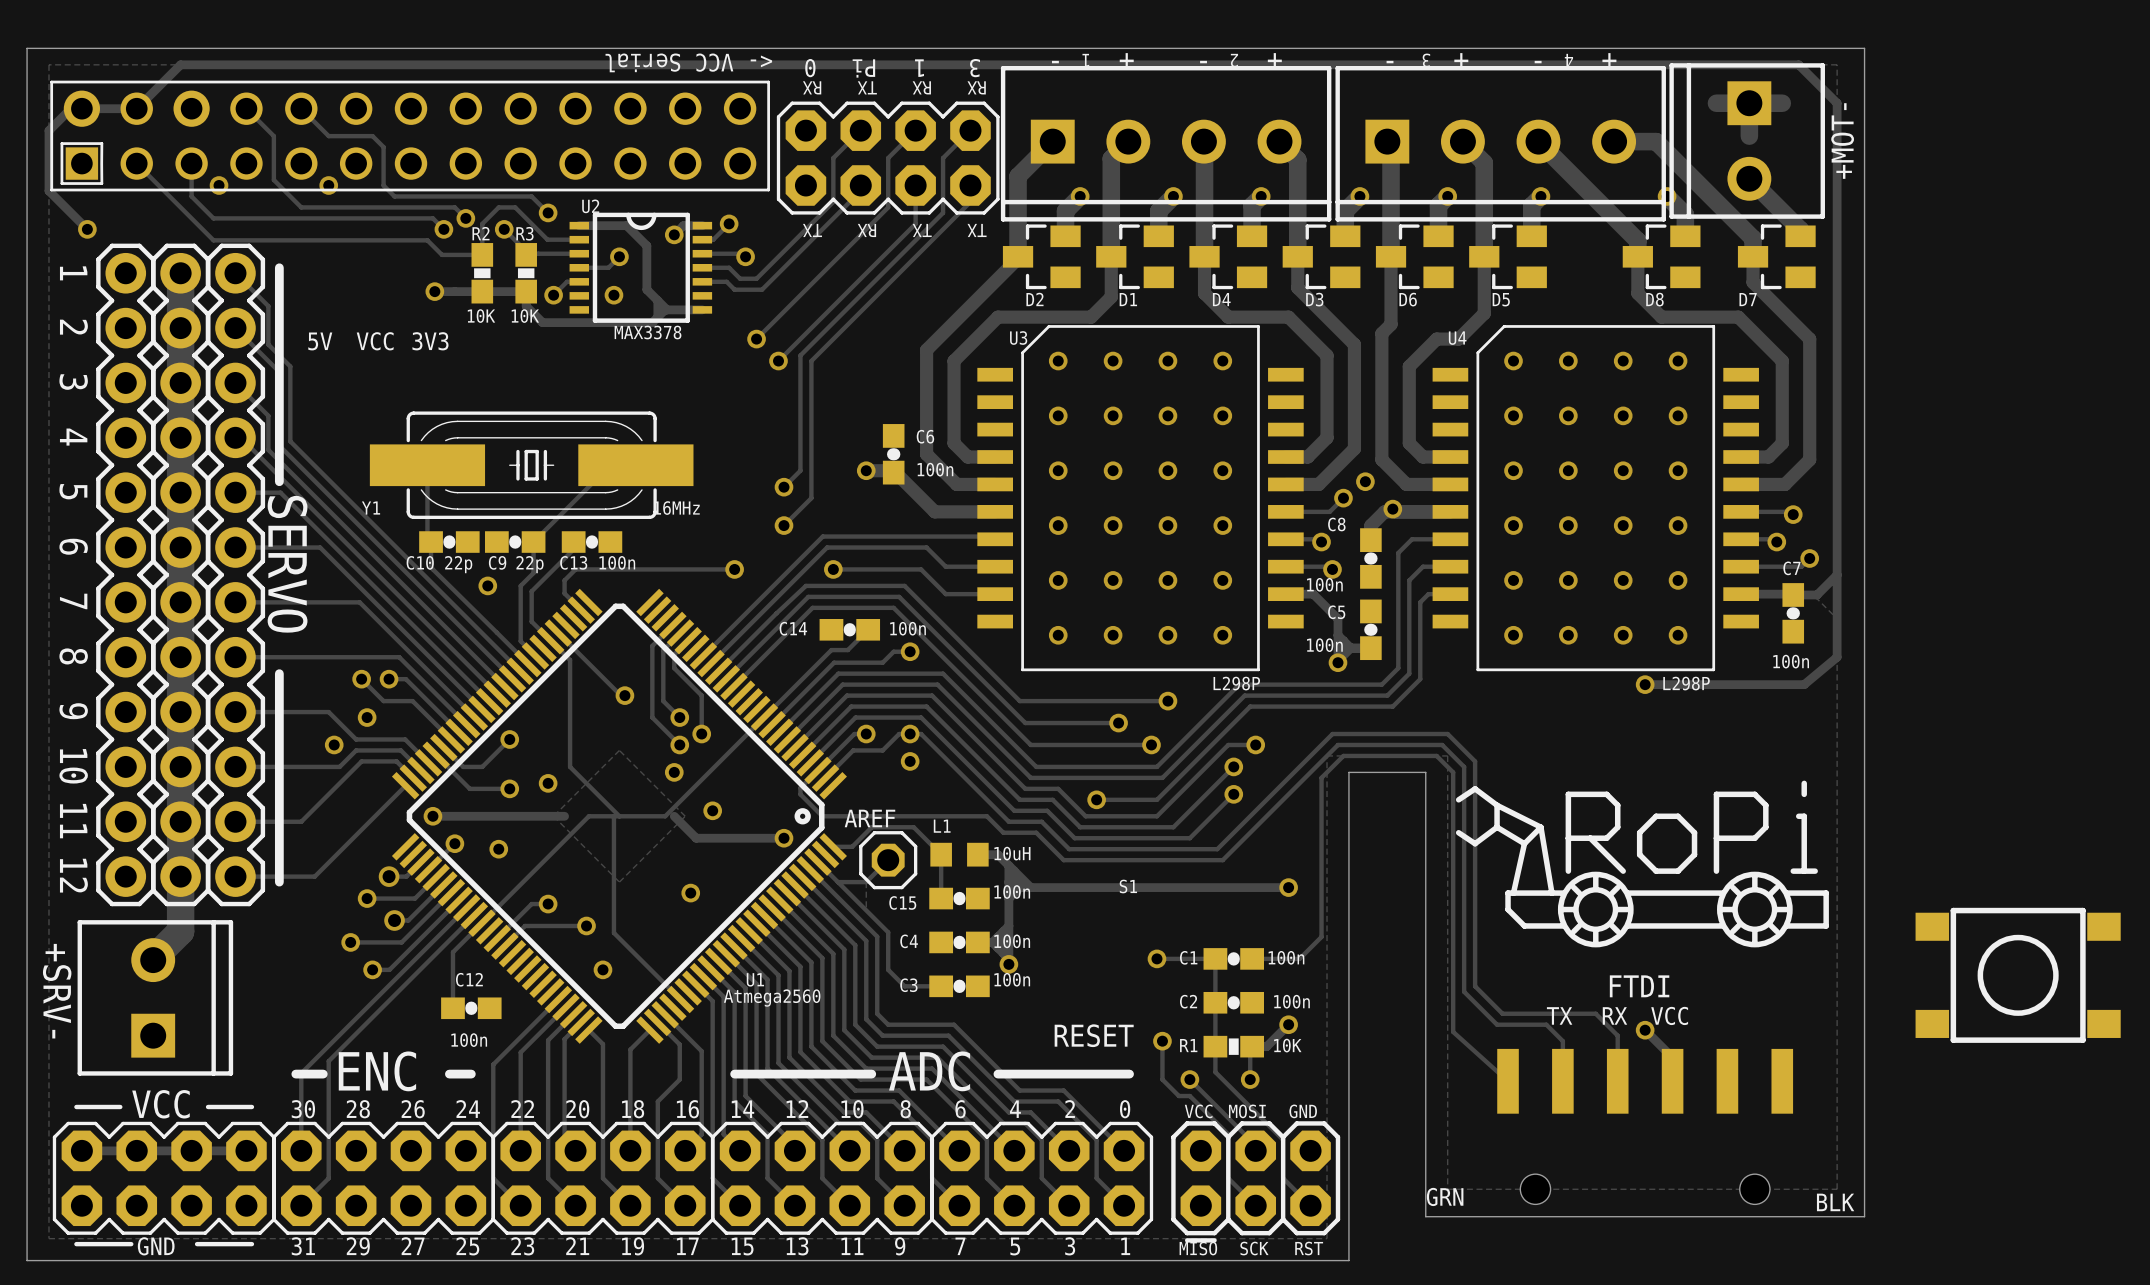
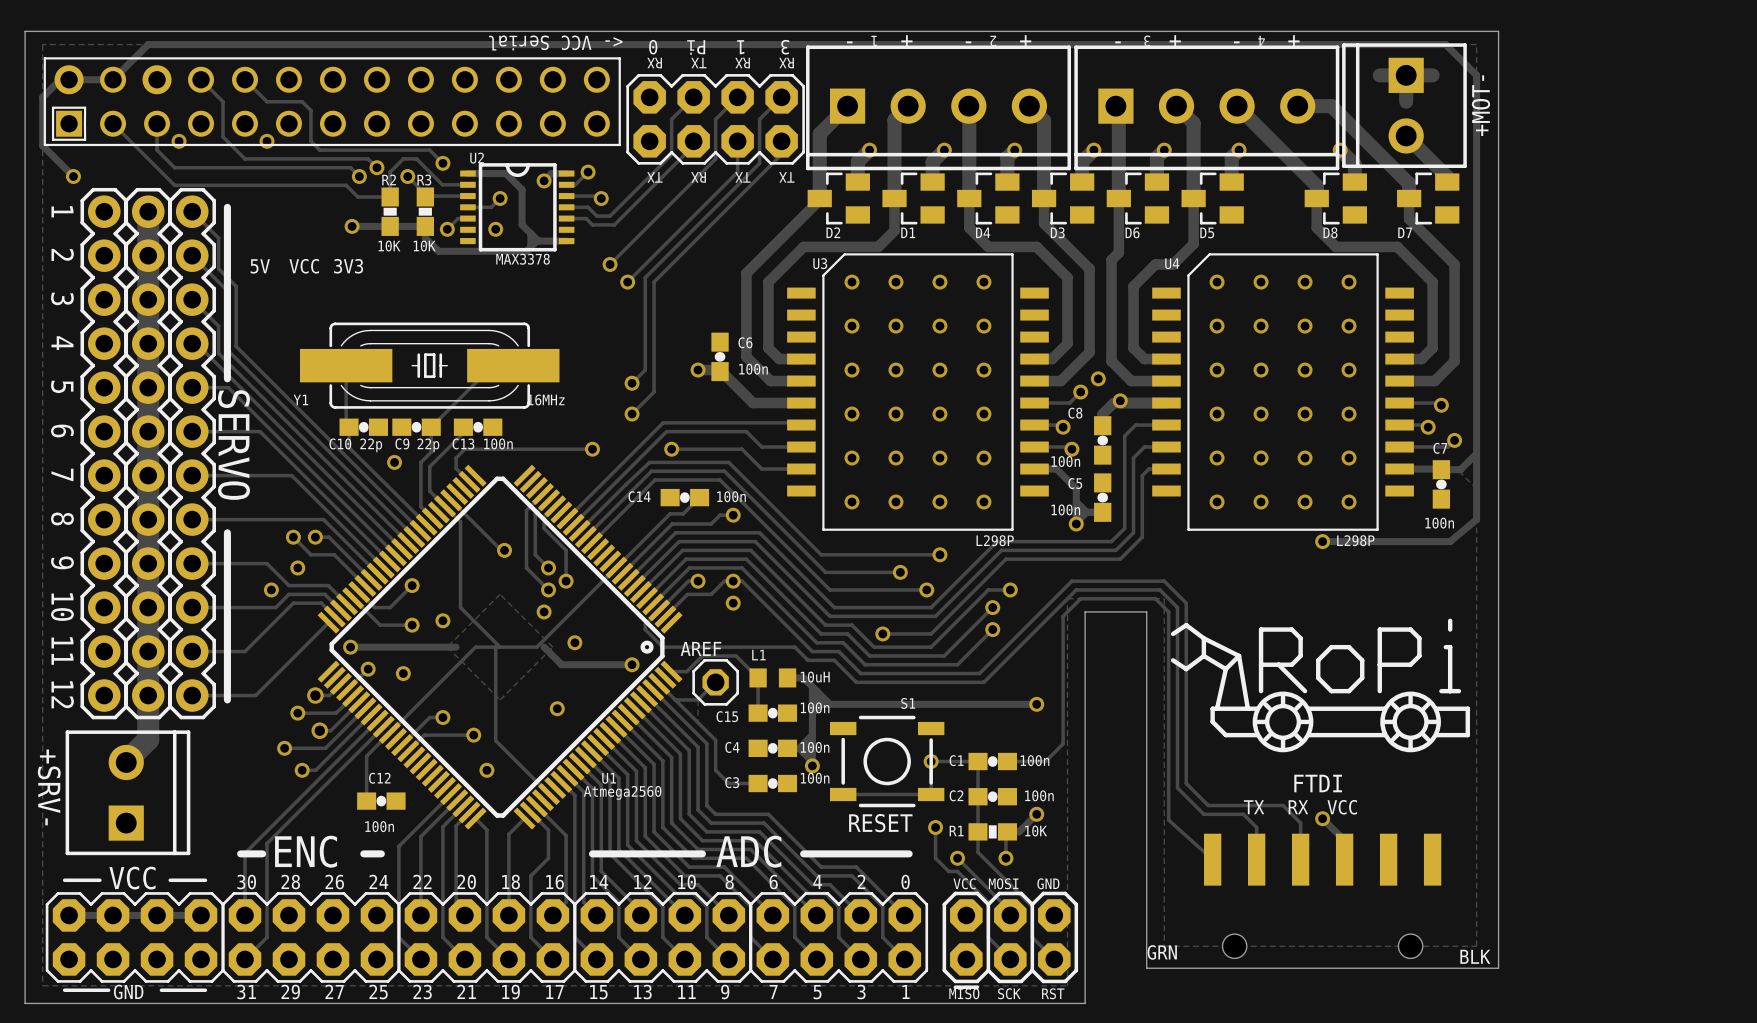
part: none -> (887, 761)
track: none -> (931, 761) (931, 794) (843, 794)
part: (2018, 975) -> none

